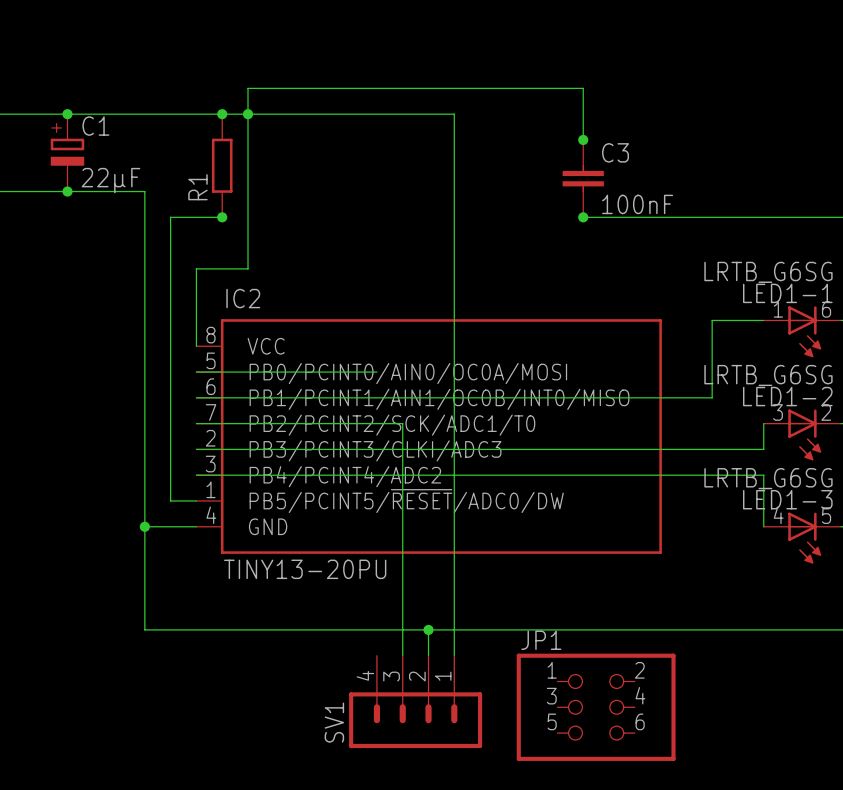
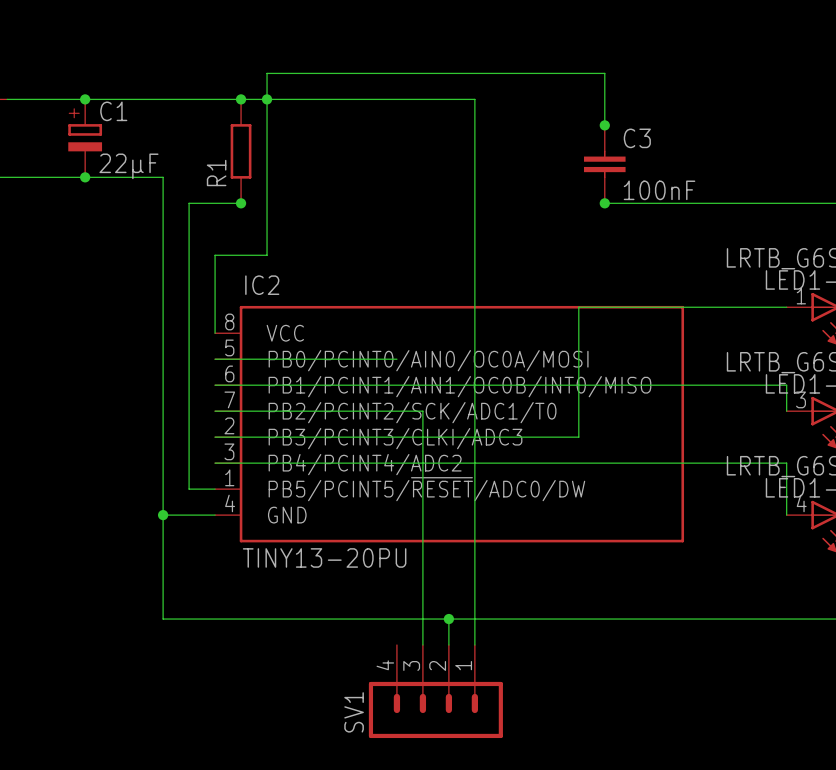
wire: (712, 320) (712, 397) -> (786, 411) (786, 385) (734, 385)
wire: (763, 423) (763, 449) (557, 449) -> (734, 307) (578, 307) (578, 437)
JP1: (596, 707) -> none

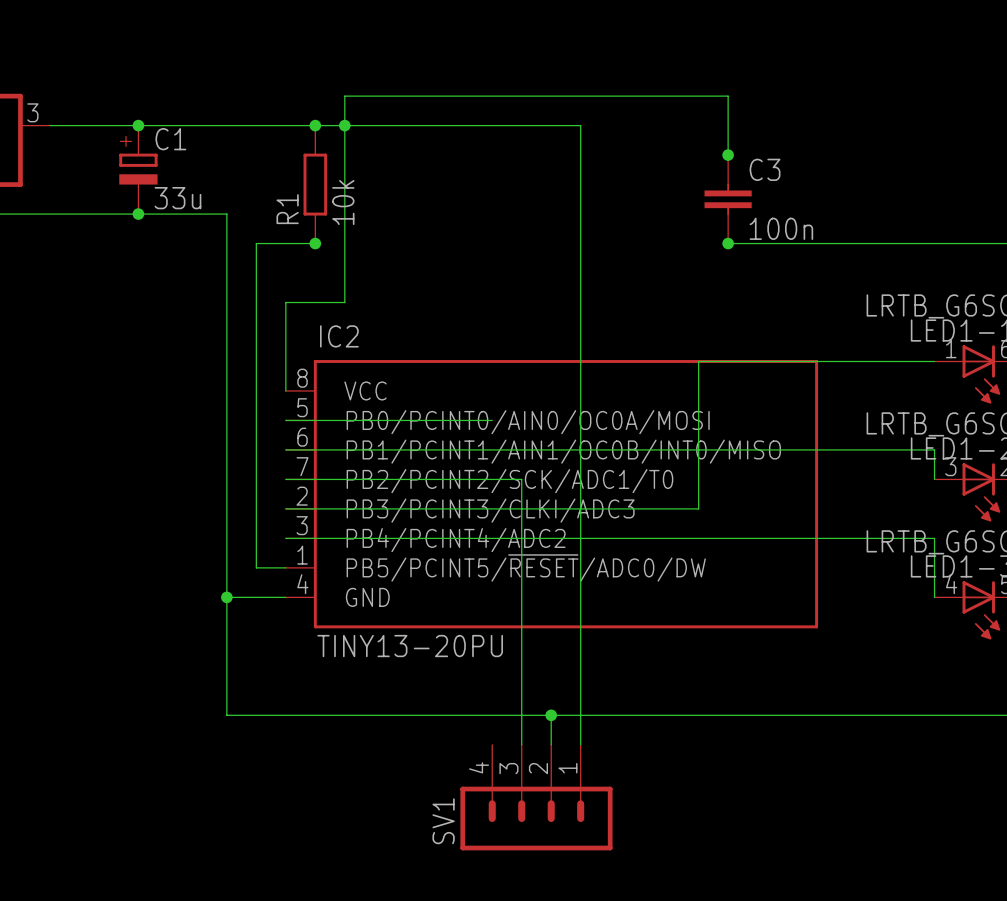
C1 value: 22µF (128, 166) -> 33u (177, 198)
R1 value: none -> 10k (343, 202)
C3 value: 100nF (659, 190) -> 100n (781, 228)

